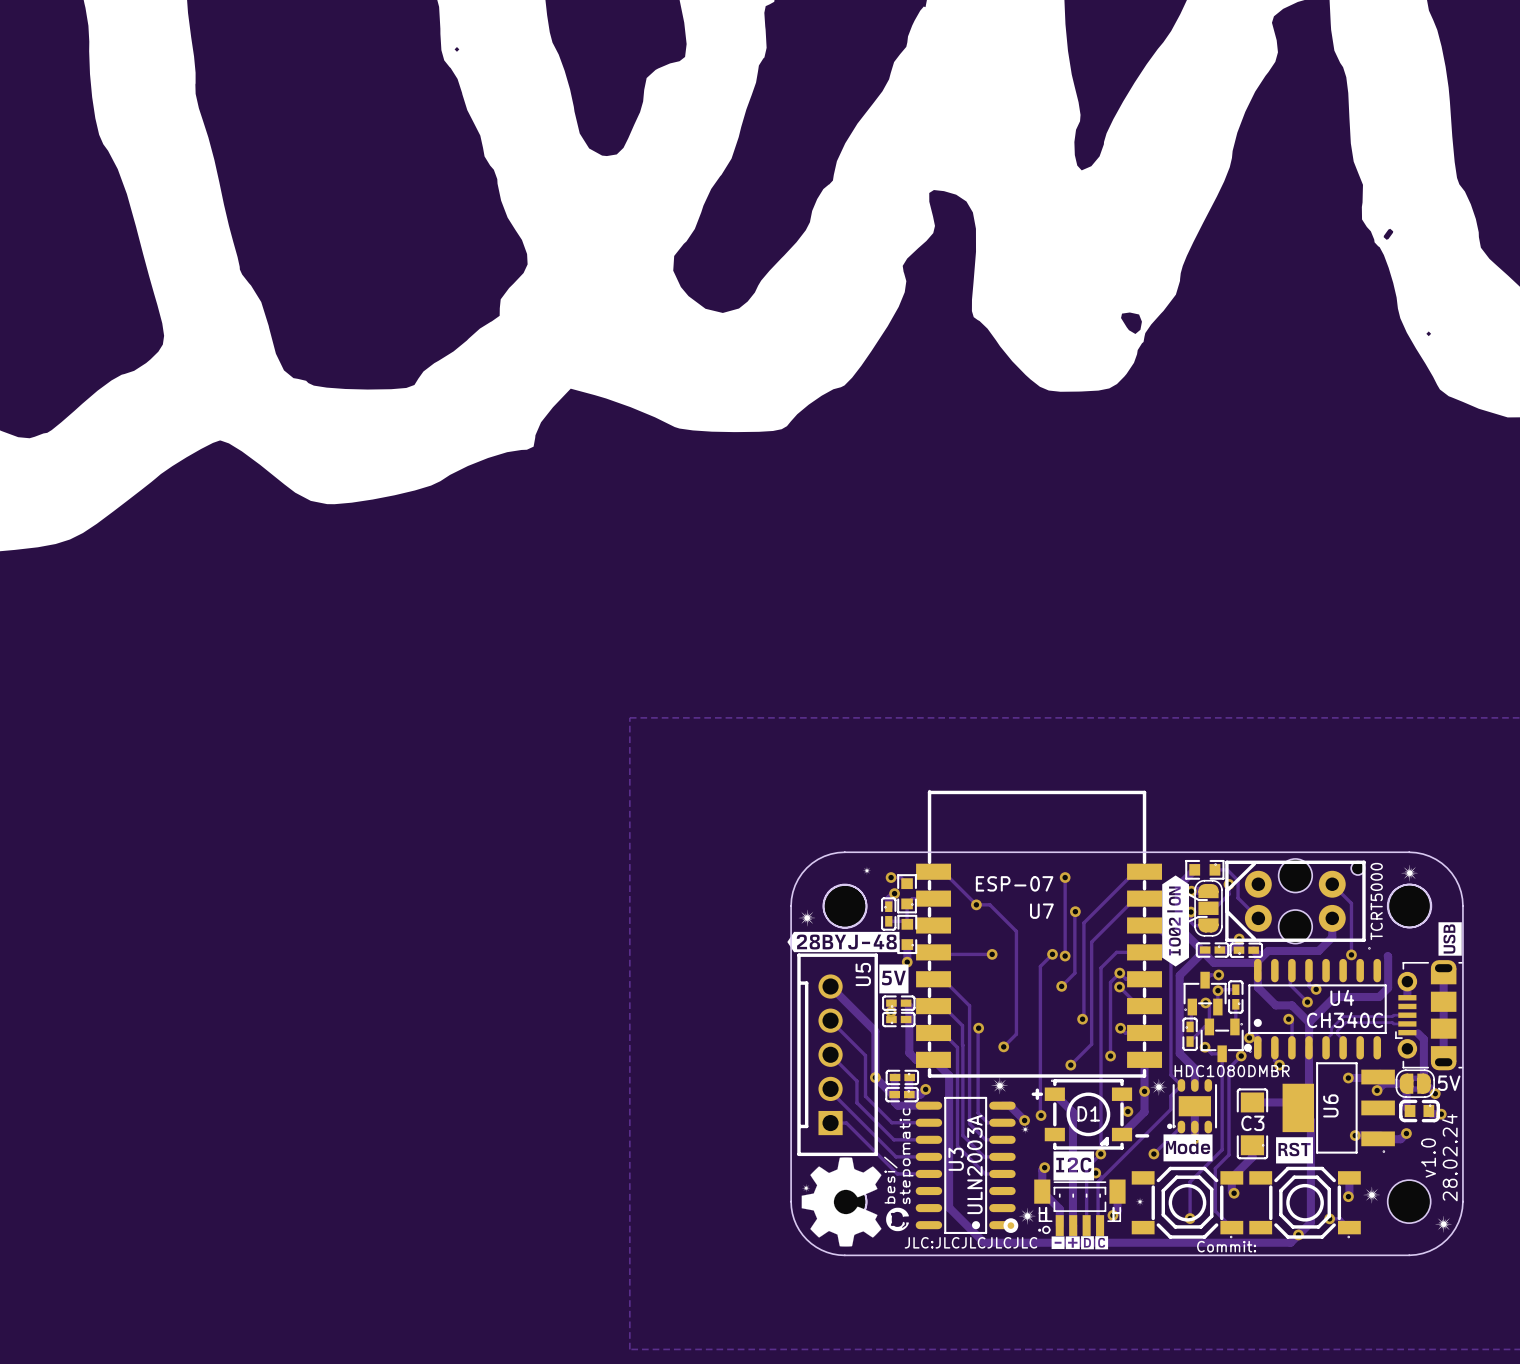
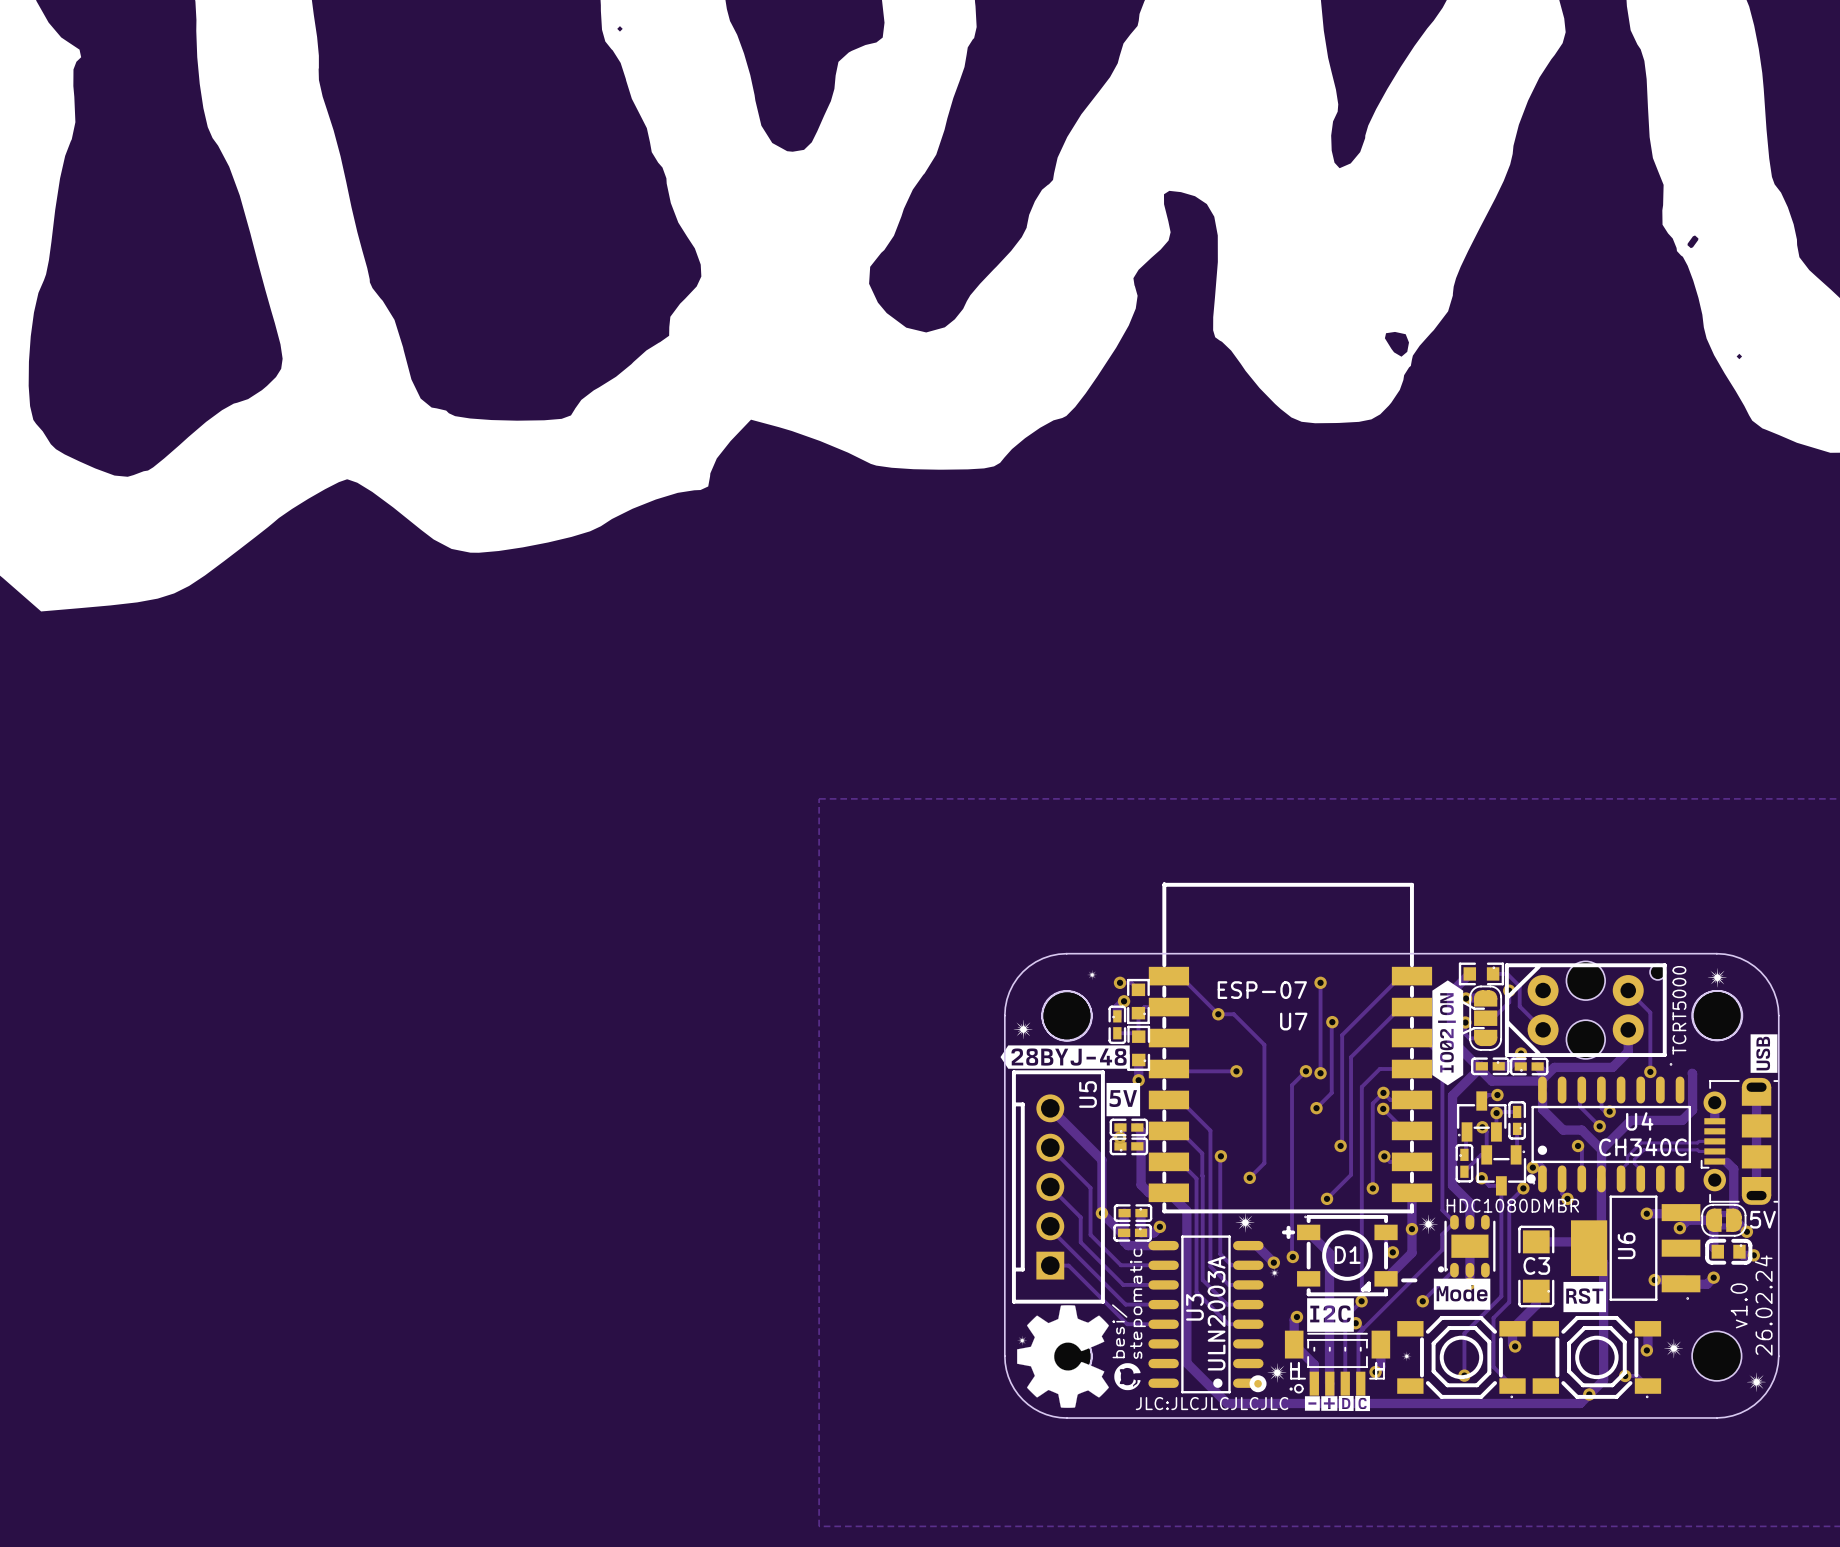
text: 28.02.24 (1449, 1157) -> 26.02.24 (1763, 1305)
text: Commit: (1226, 1246) -> none

